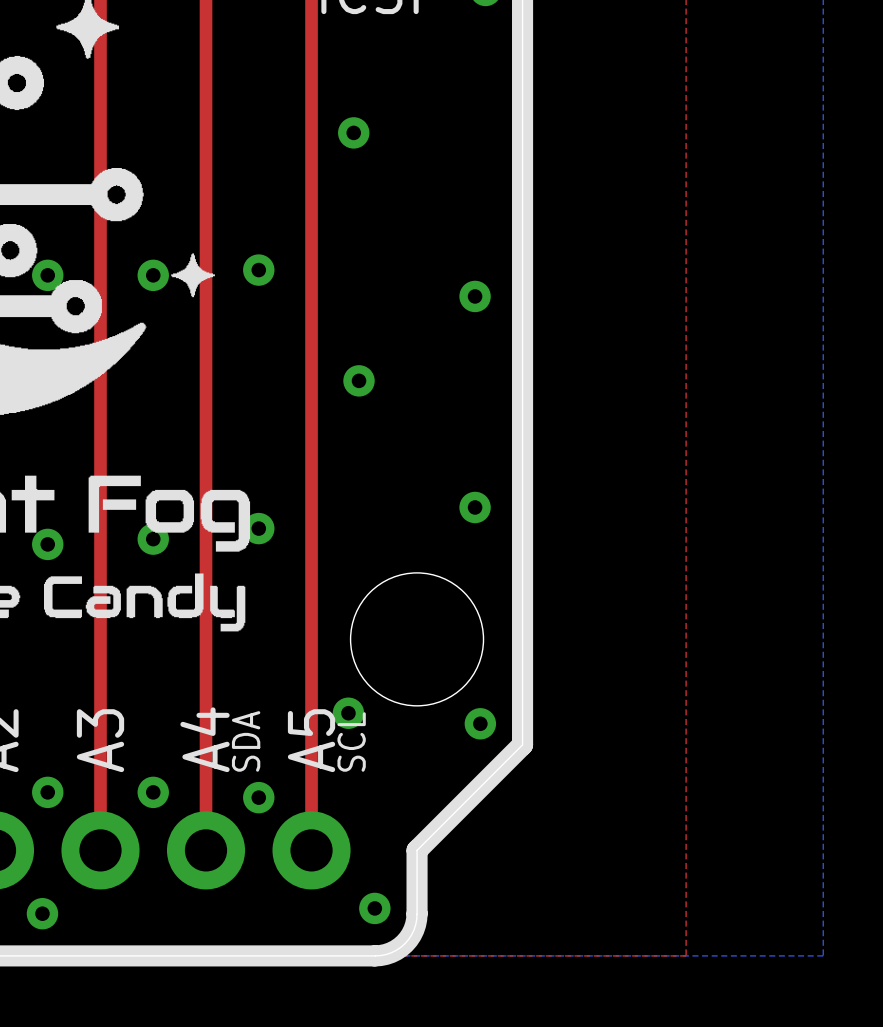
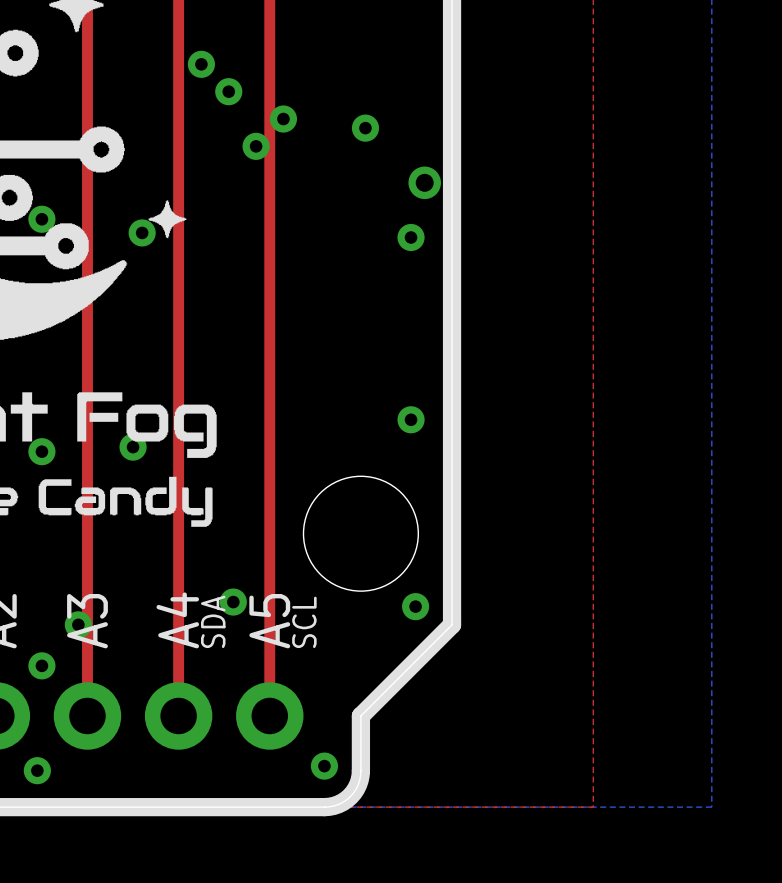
via: none -> (201, 64)
via: none -> (228, 91)
via position: (353, 132) -> (283, 119)
via: none -> (365, 128)
via: none -> (256, 146)
via: none -> (424, 182)
via: (258, 270) -> none
via position: (153, 275) -> (142, 232)
via: (359, 380) -> none
via: (258, 528) -> none
via: (348, 713) -> none
via: none -> (233, 602)
via: none -> (78, 624)
via: (153, 792) -> none
via: (258, 797) -> none

